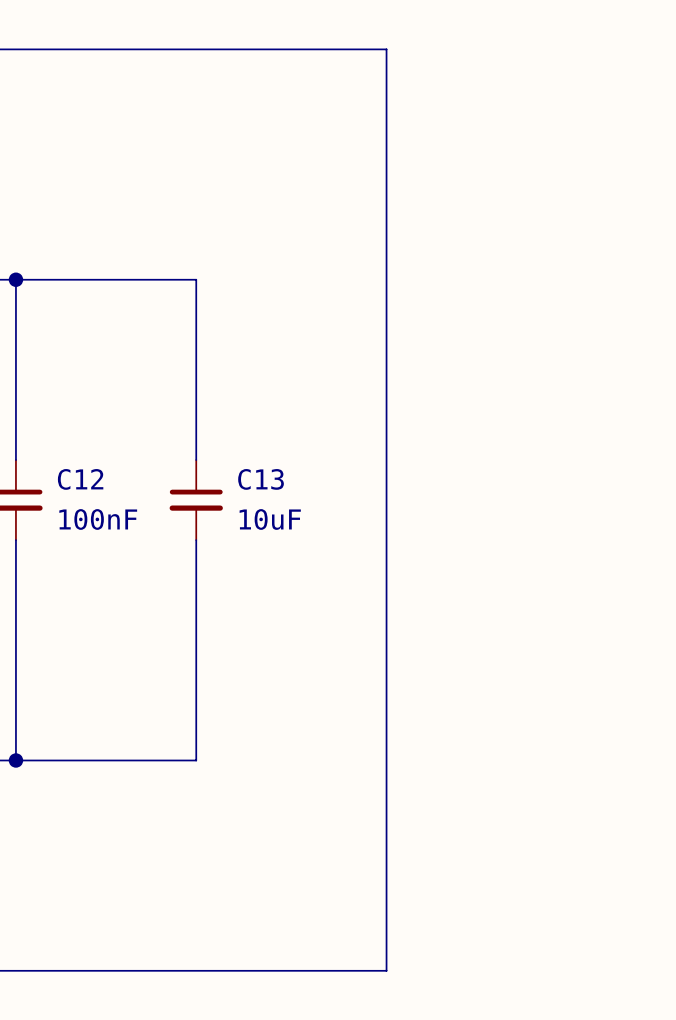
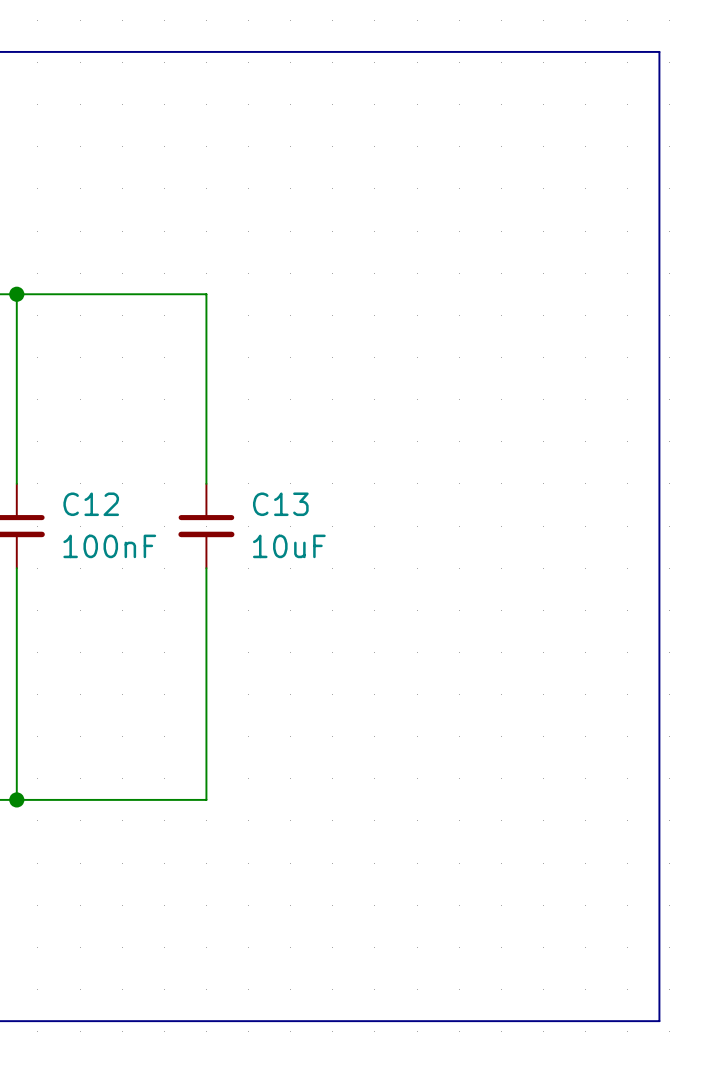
line: (386, 49) (386, 970) -> (406, 51) (659, 51) (659, 1021) (406, 1021)

